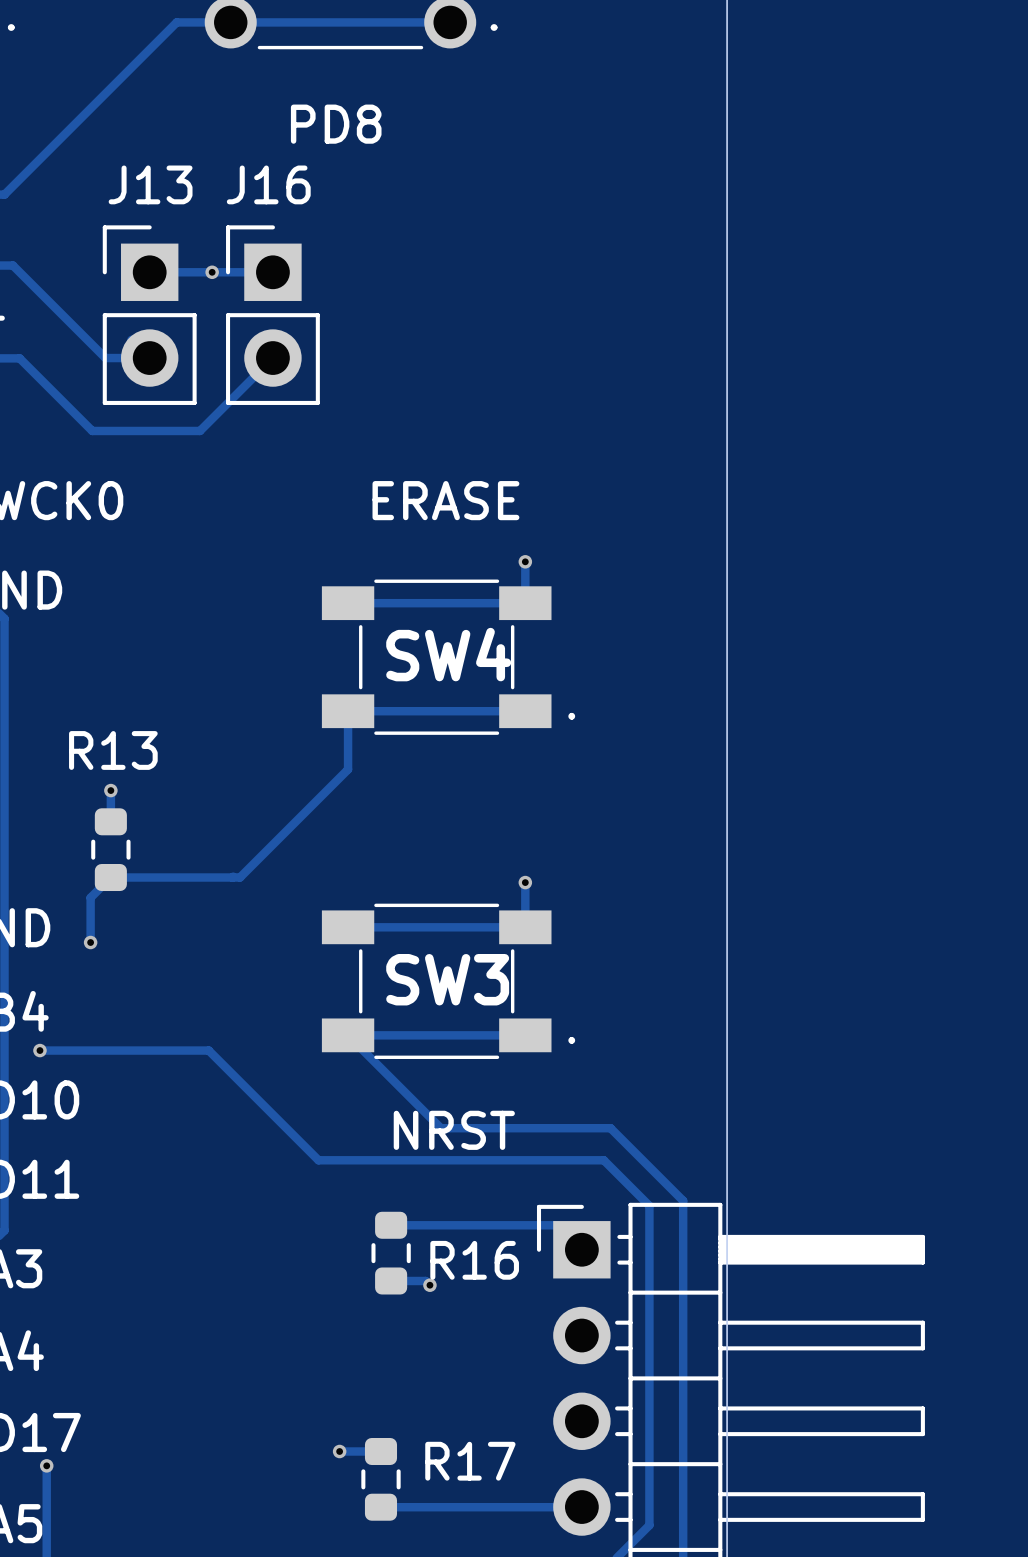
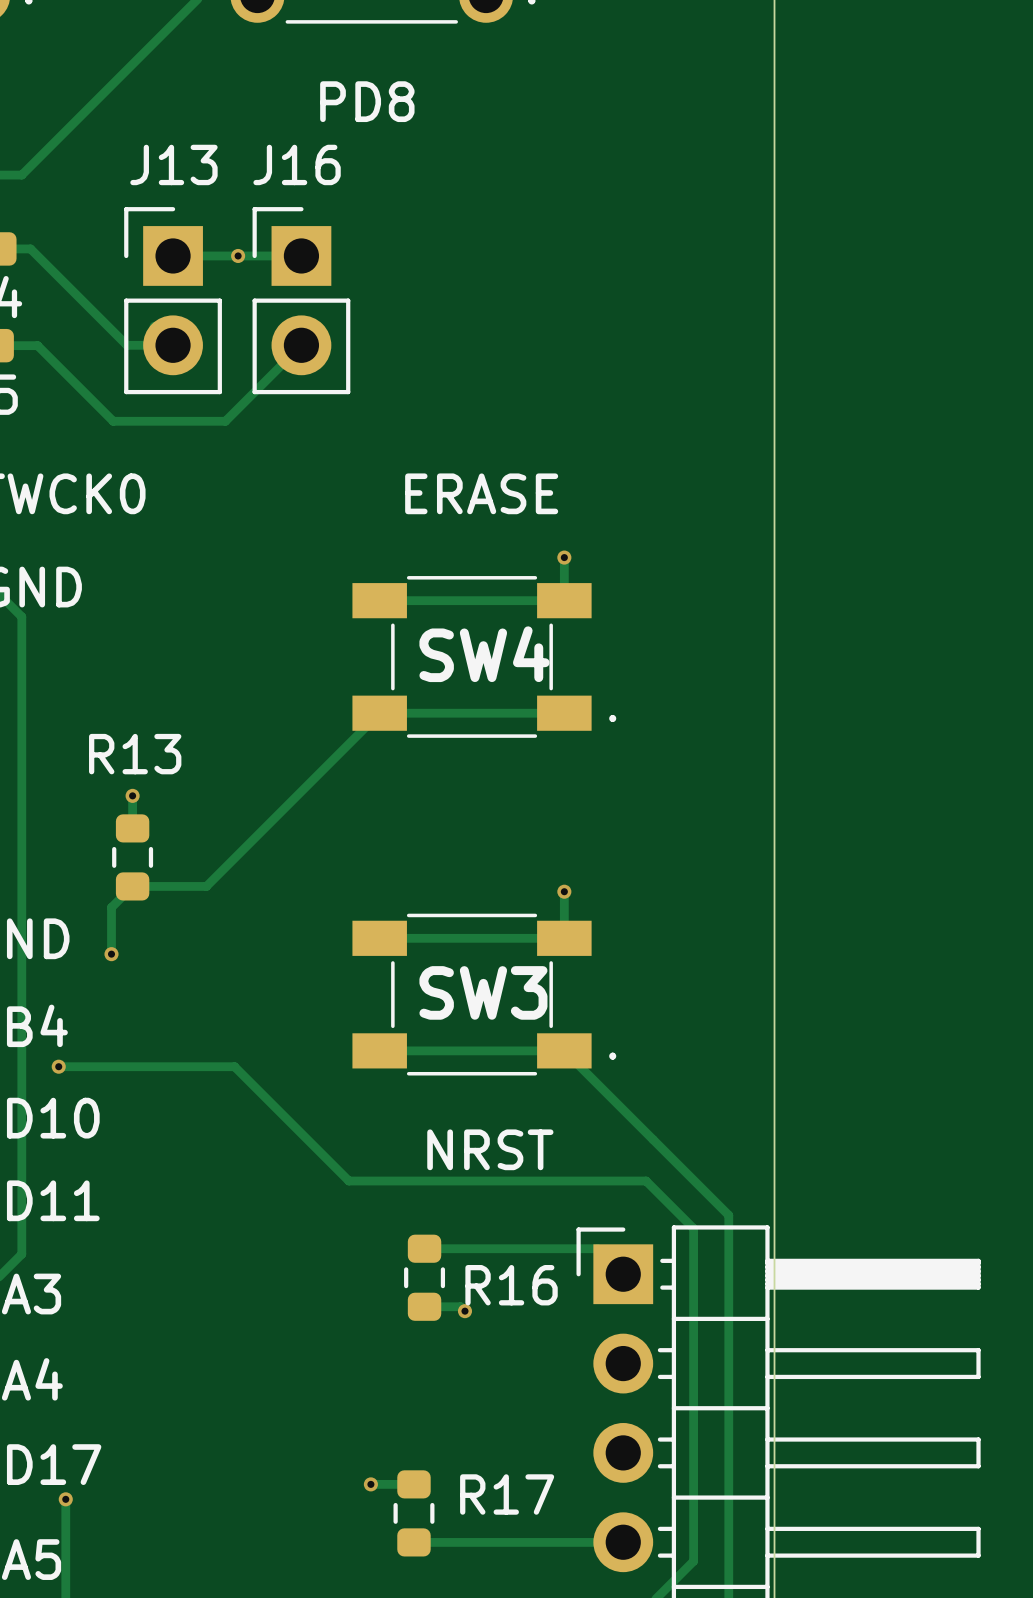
track: (348, 717) (348, 769) (240, 877) (181, 877) -> (379, 713) (206, 886)
track: (348, 1035) (440, 1128) (610, 1128) (683, 1200) -> (564, 1050) (728, 1215) (728, 1223)

